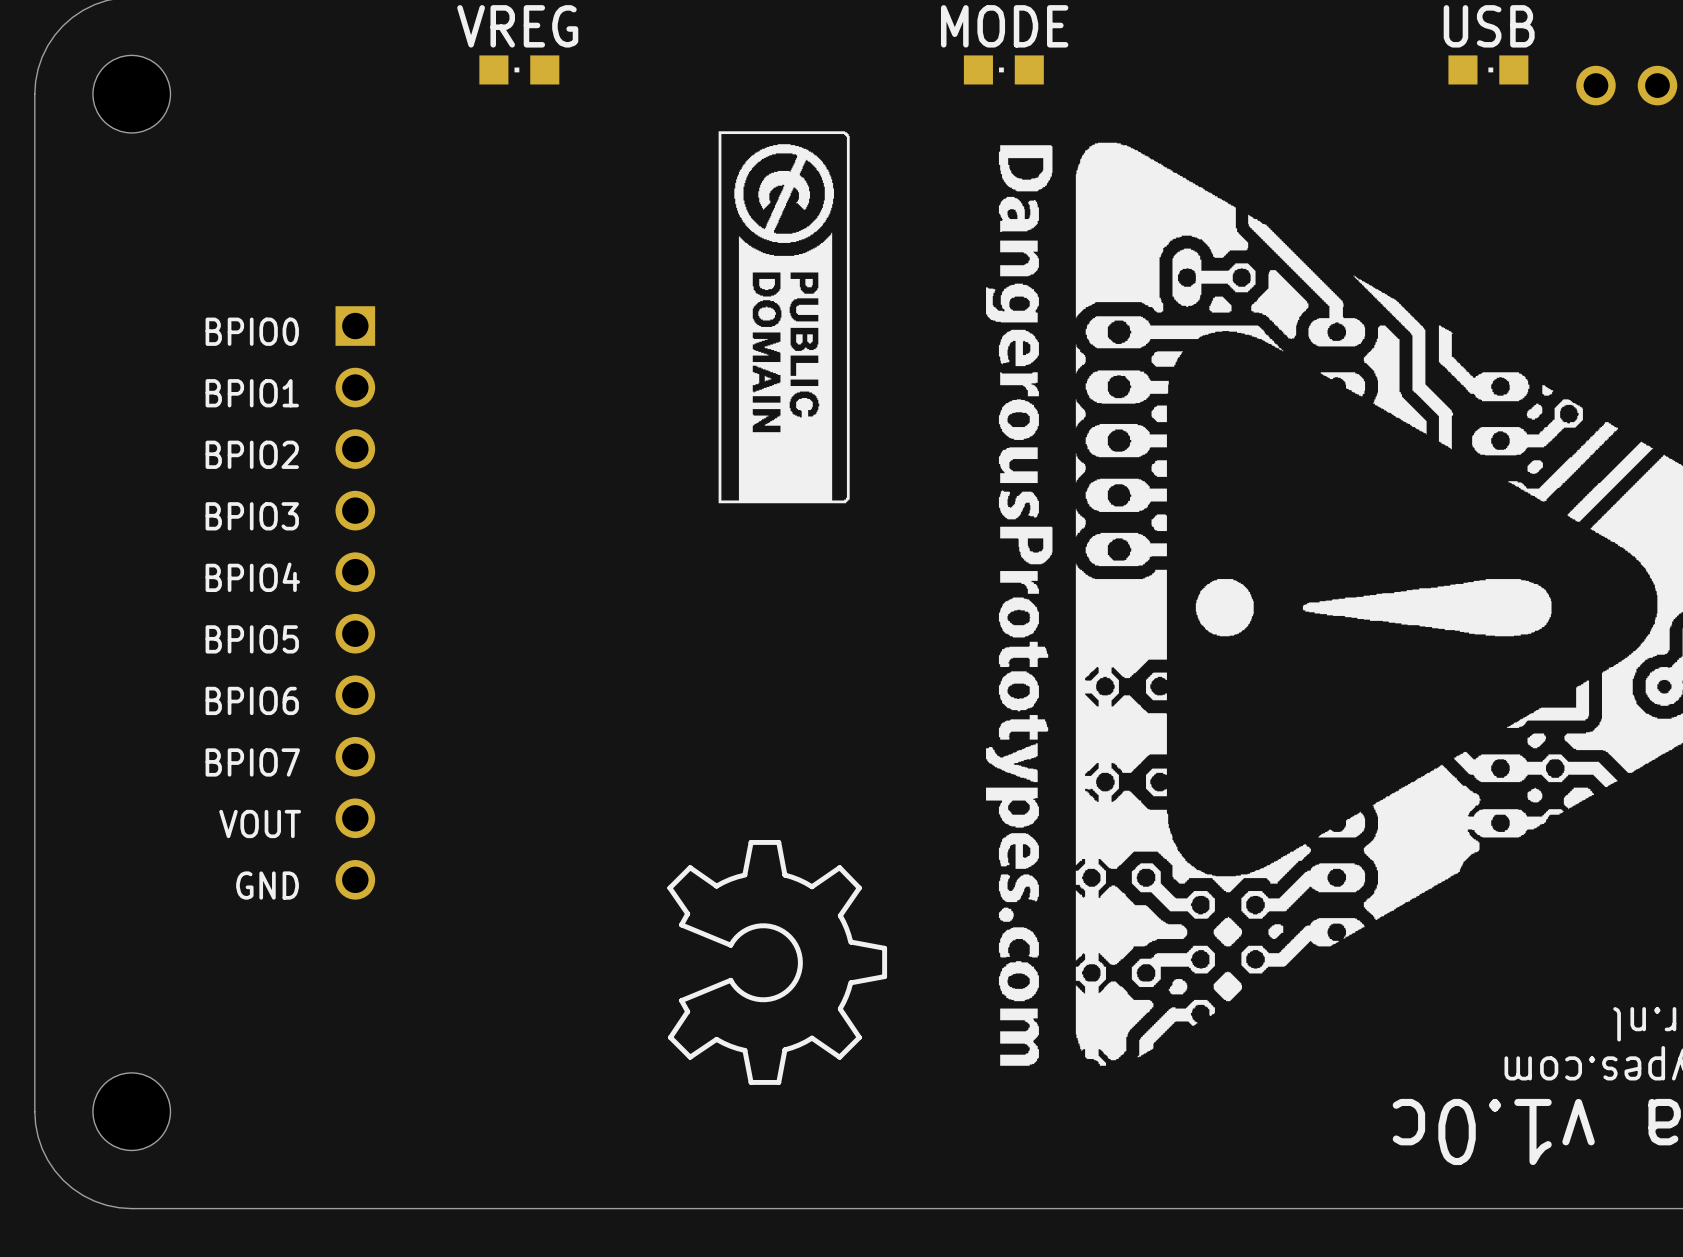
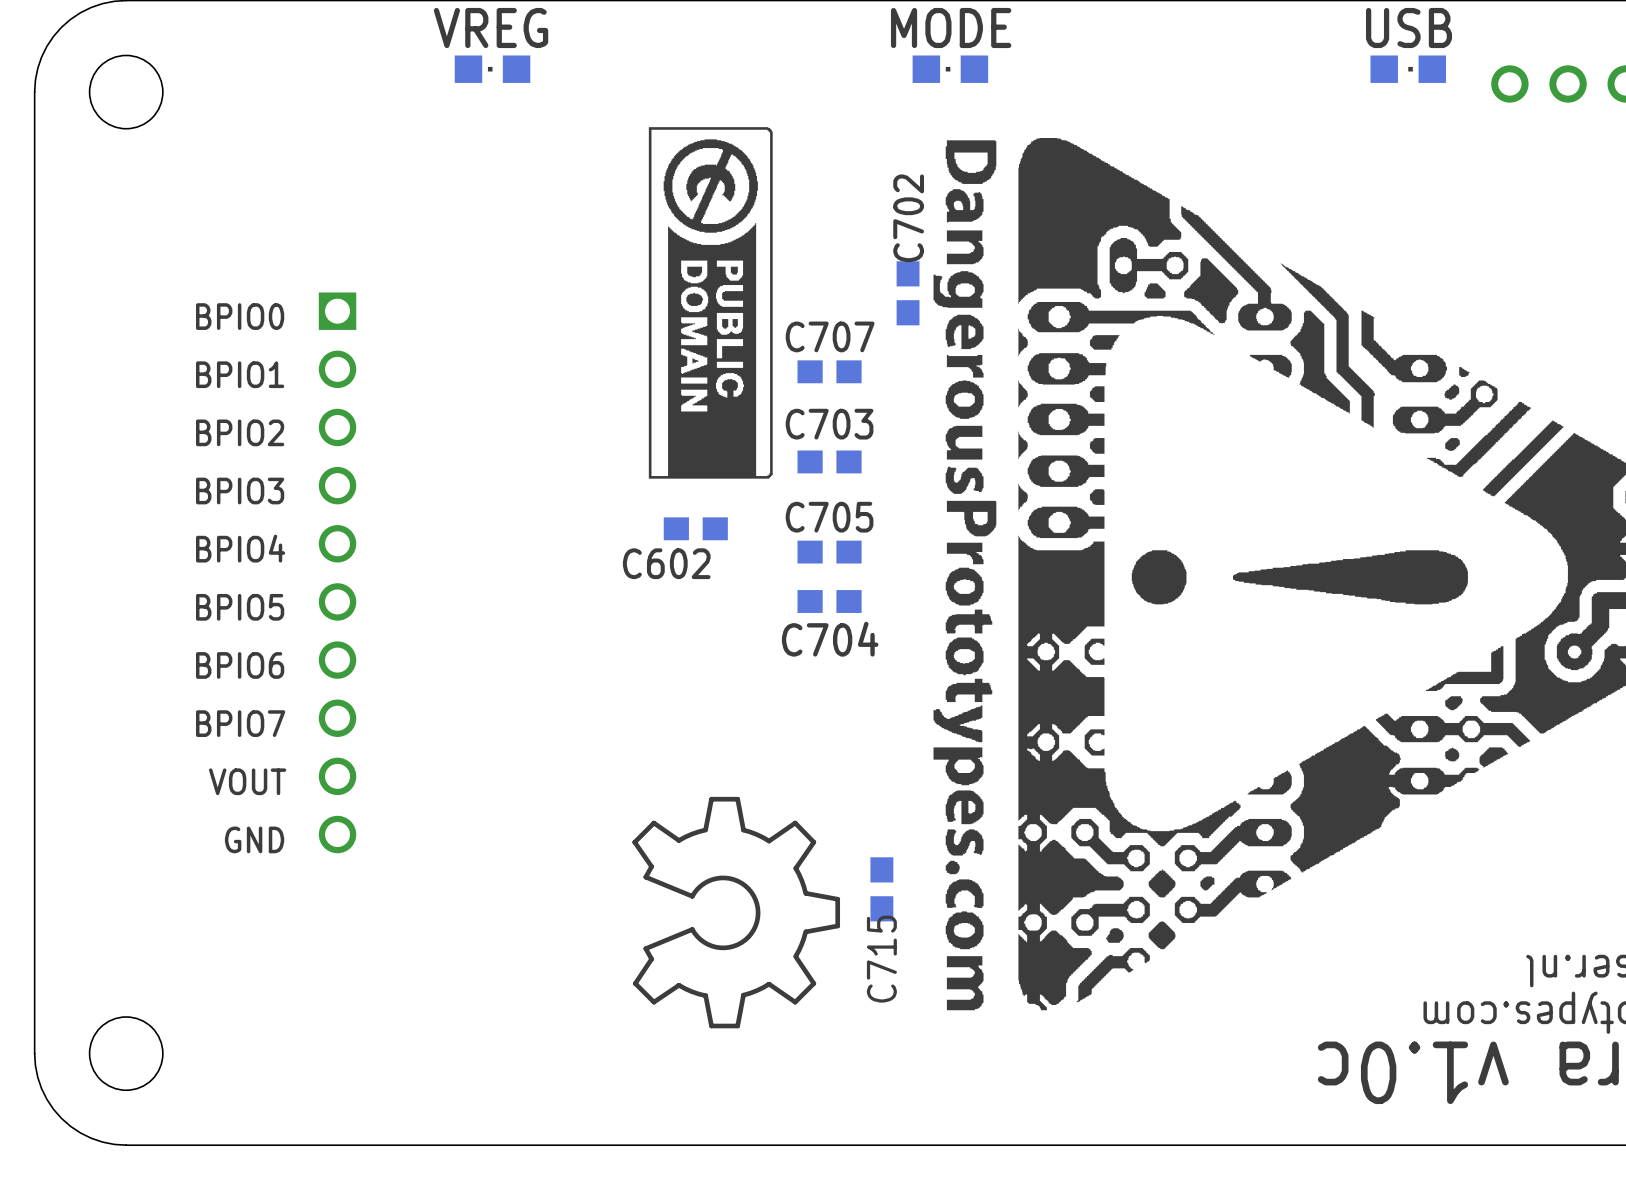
C702: none -> (908, 293)
drawing position: (784, 317) -> (710, 302)
C707: none -> (829, 371)
C703: none -> (829, 461)
C602: none -> (695, 528)
C705: none -> (829, 552)
C704: none -> (829, 601)
C715: none -> (881, 889)

